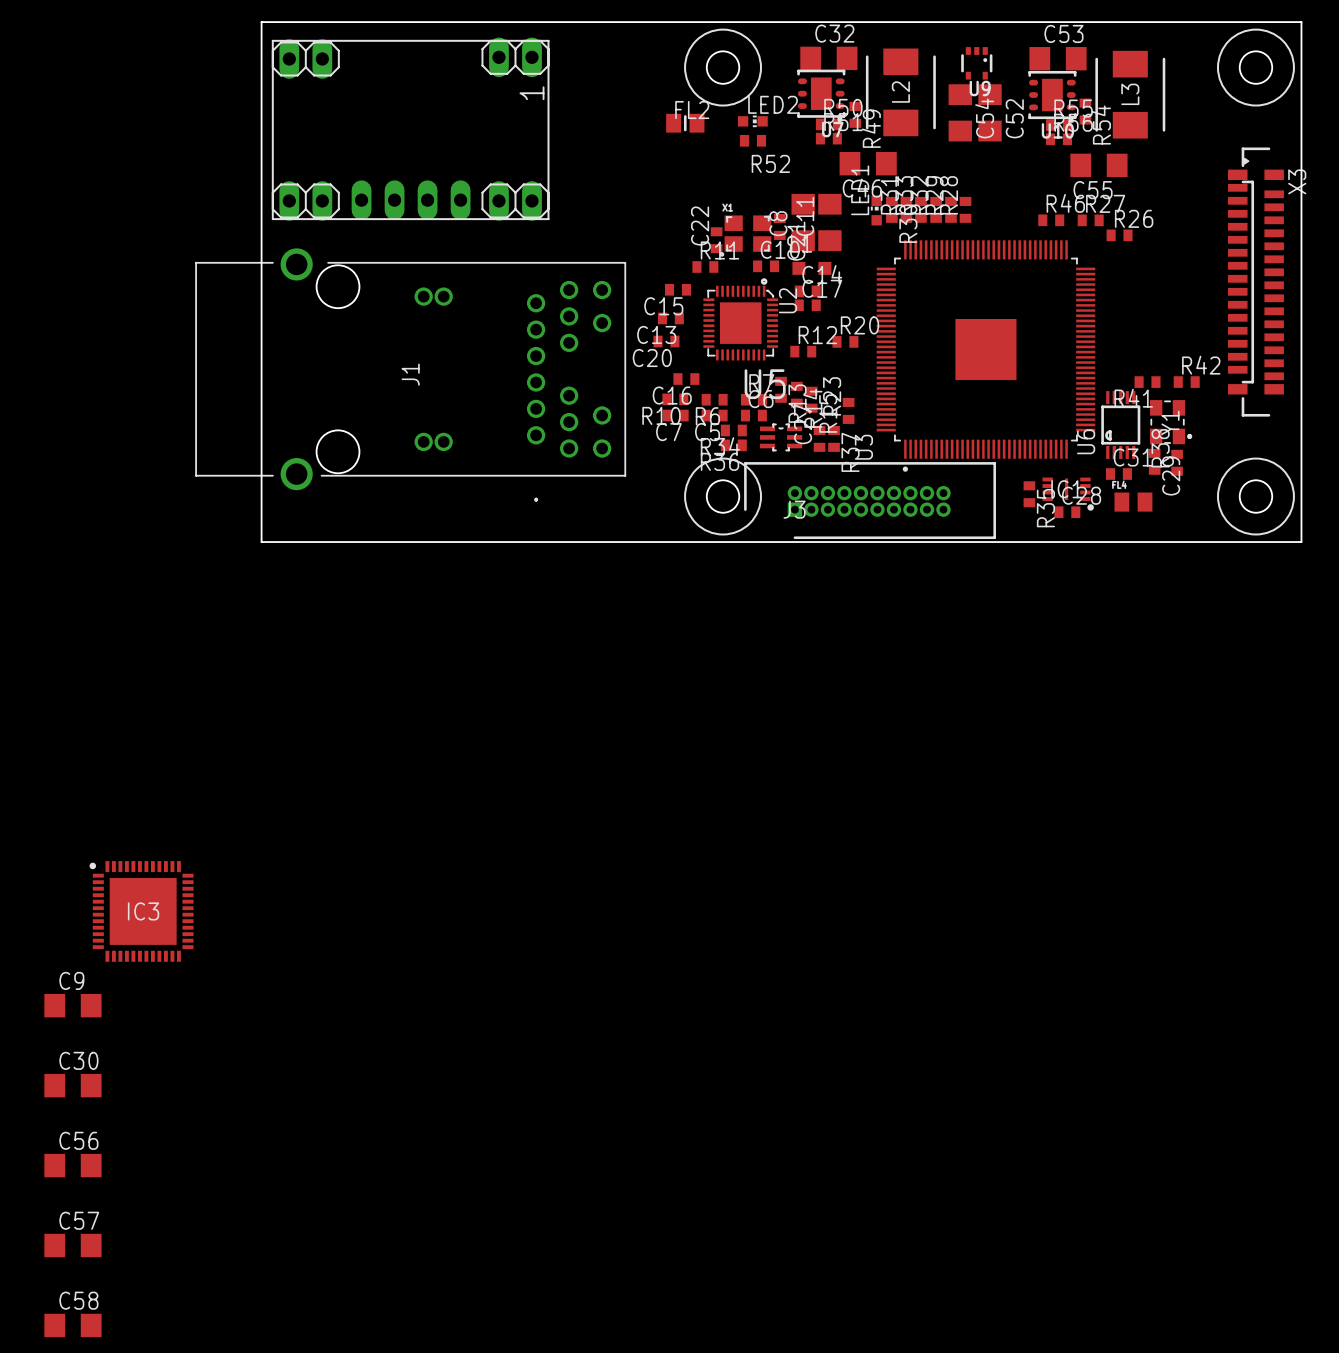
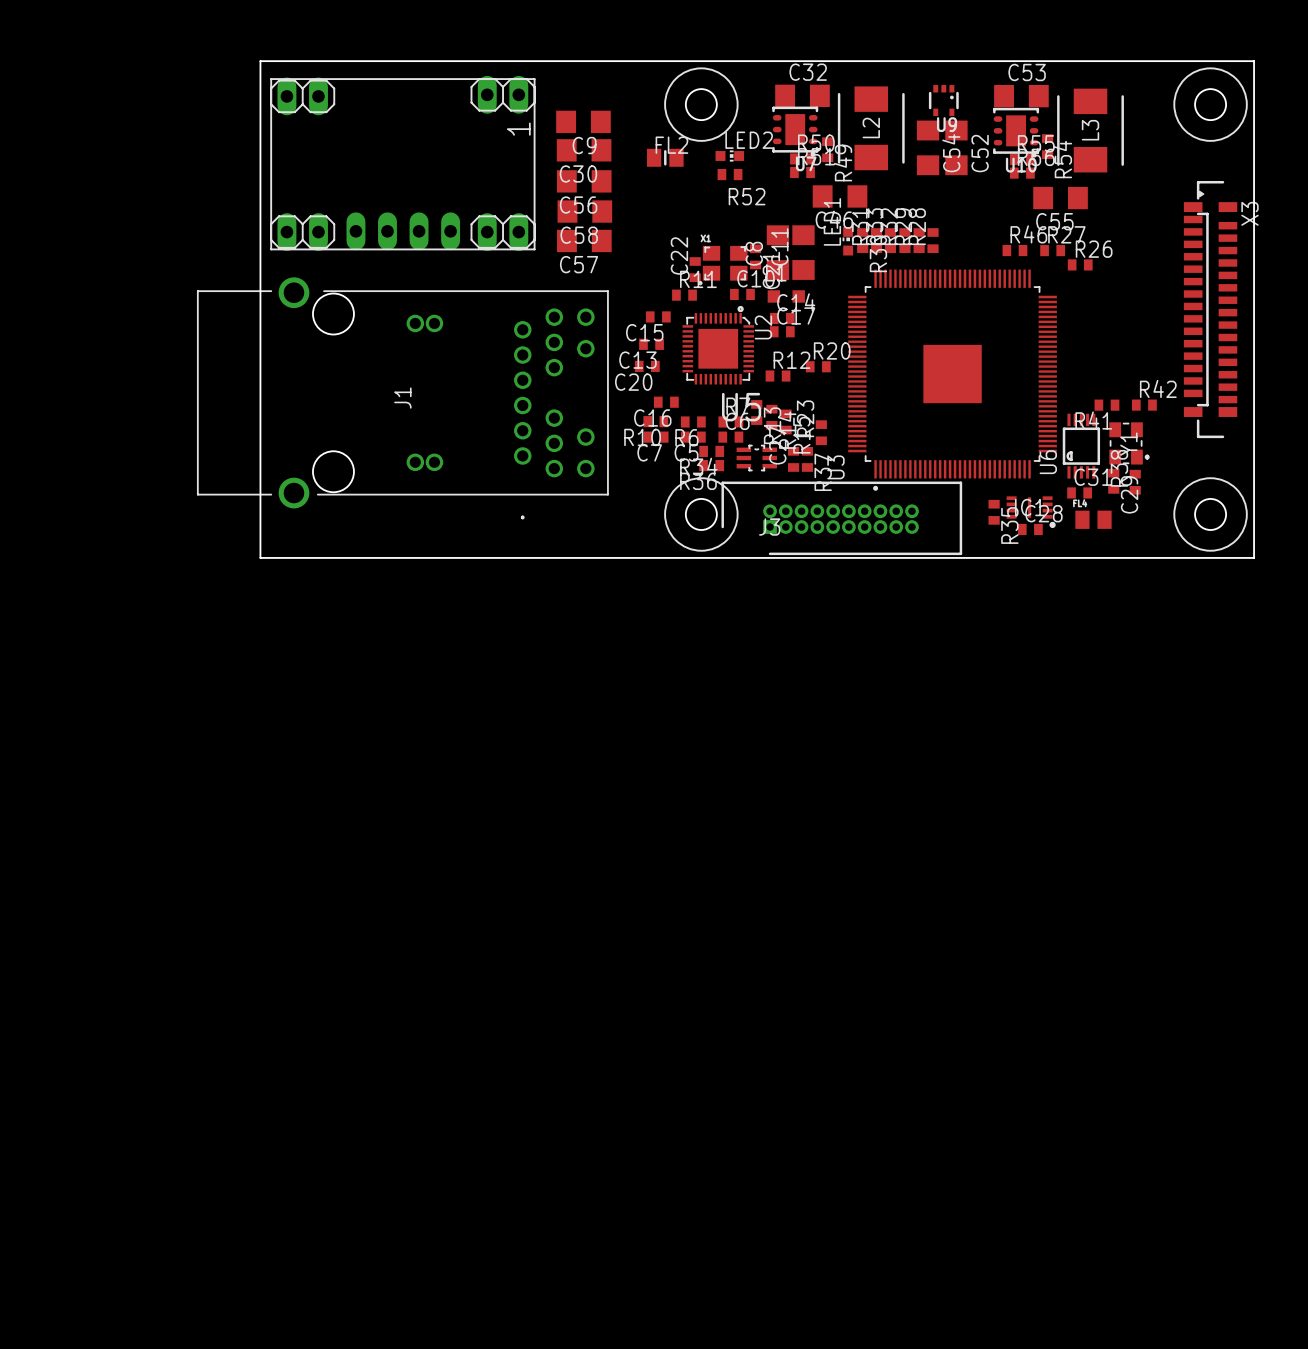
IC3: (141, 911) -> none
C9 name position: C9 (71, 980) -> C9 (584, 145)
C9 position: (72, 1005) -> (583, 121)
C30 name position: C30 (78, 1060) -> C30 (578, 173)
C30 position: (72, 1085) -> (584, 150)
C56 name position: C56 (78, 1140) -> C56 (578, 205)
C56 position: (72, 1165) -> (584, 181)
C57 name position: C57 (79, 1220) -> C57 (579, 264)
C57 position: (72, 1245) -> (584, 240)
C58 name position: C58 (78, 1300) -> C58 (579, 235)
C58 position: (72, 1325) -> (584, 211)

